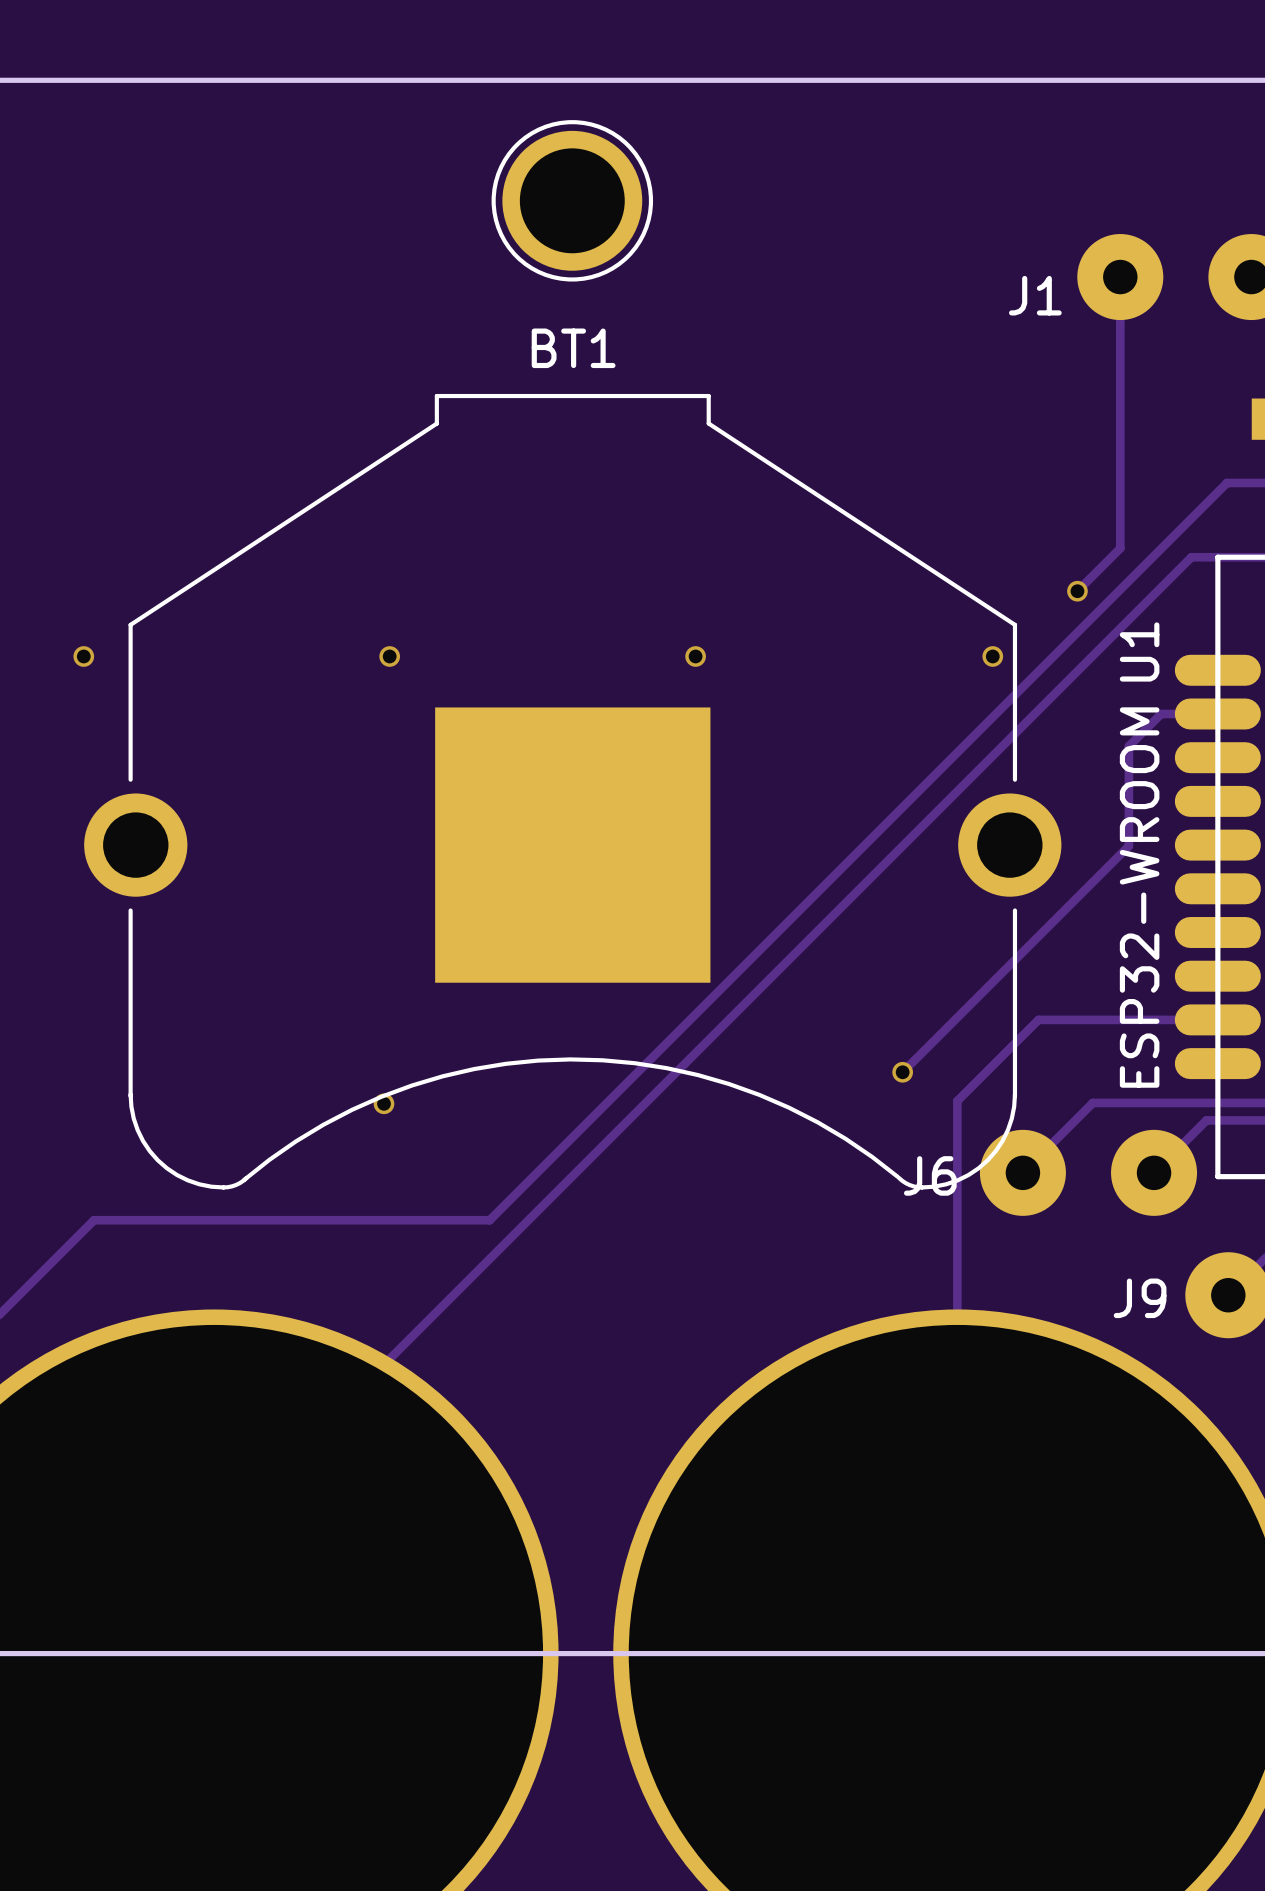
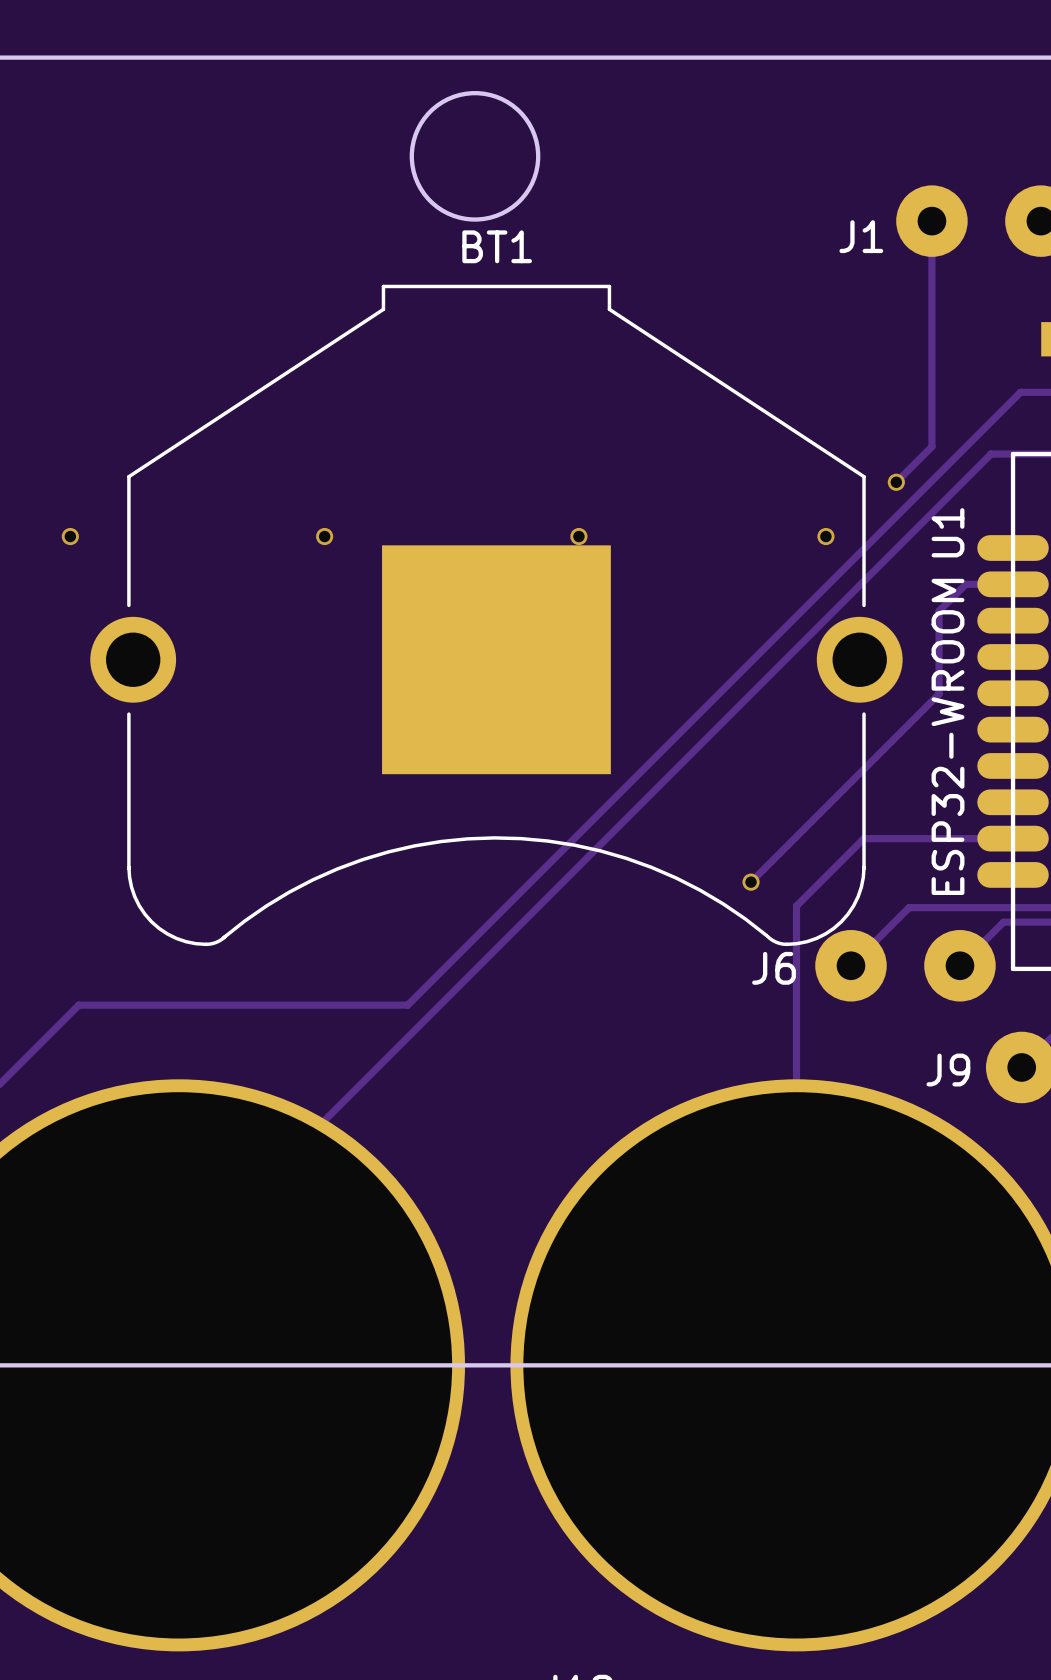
round board edge: none -> [409, 91, 541, 222]
part: (572, 200) -> none
BT1 position: (572, 791) -> (496, 615)
via: (384, 1103) -> none

